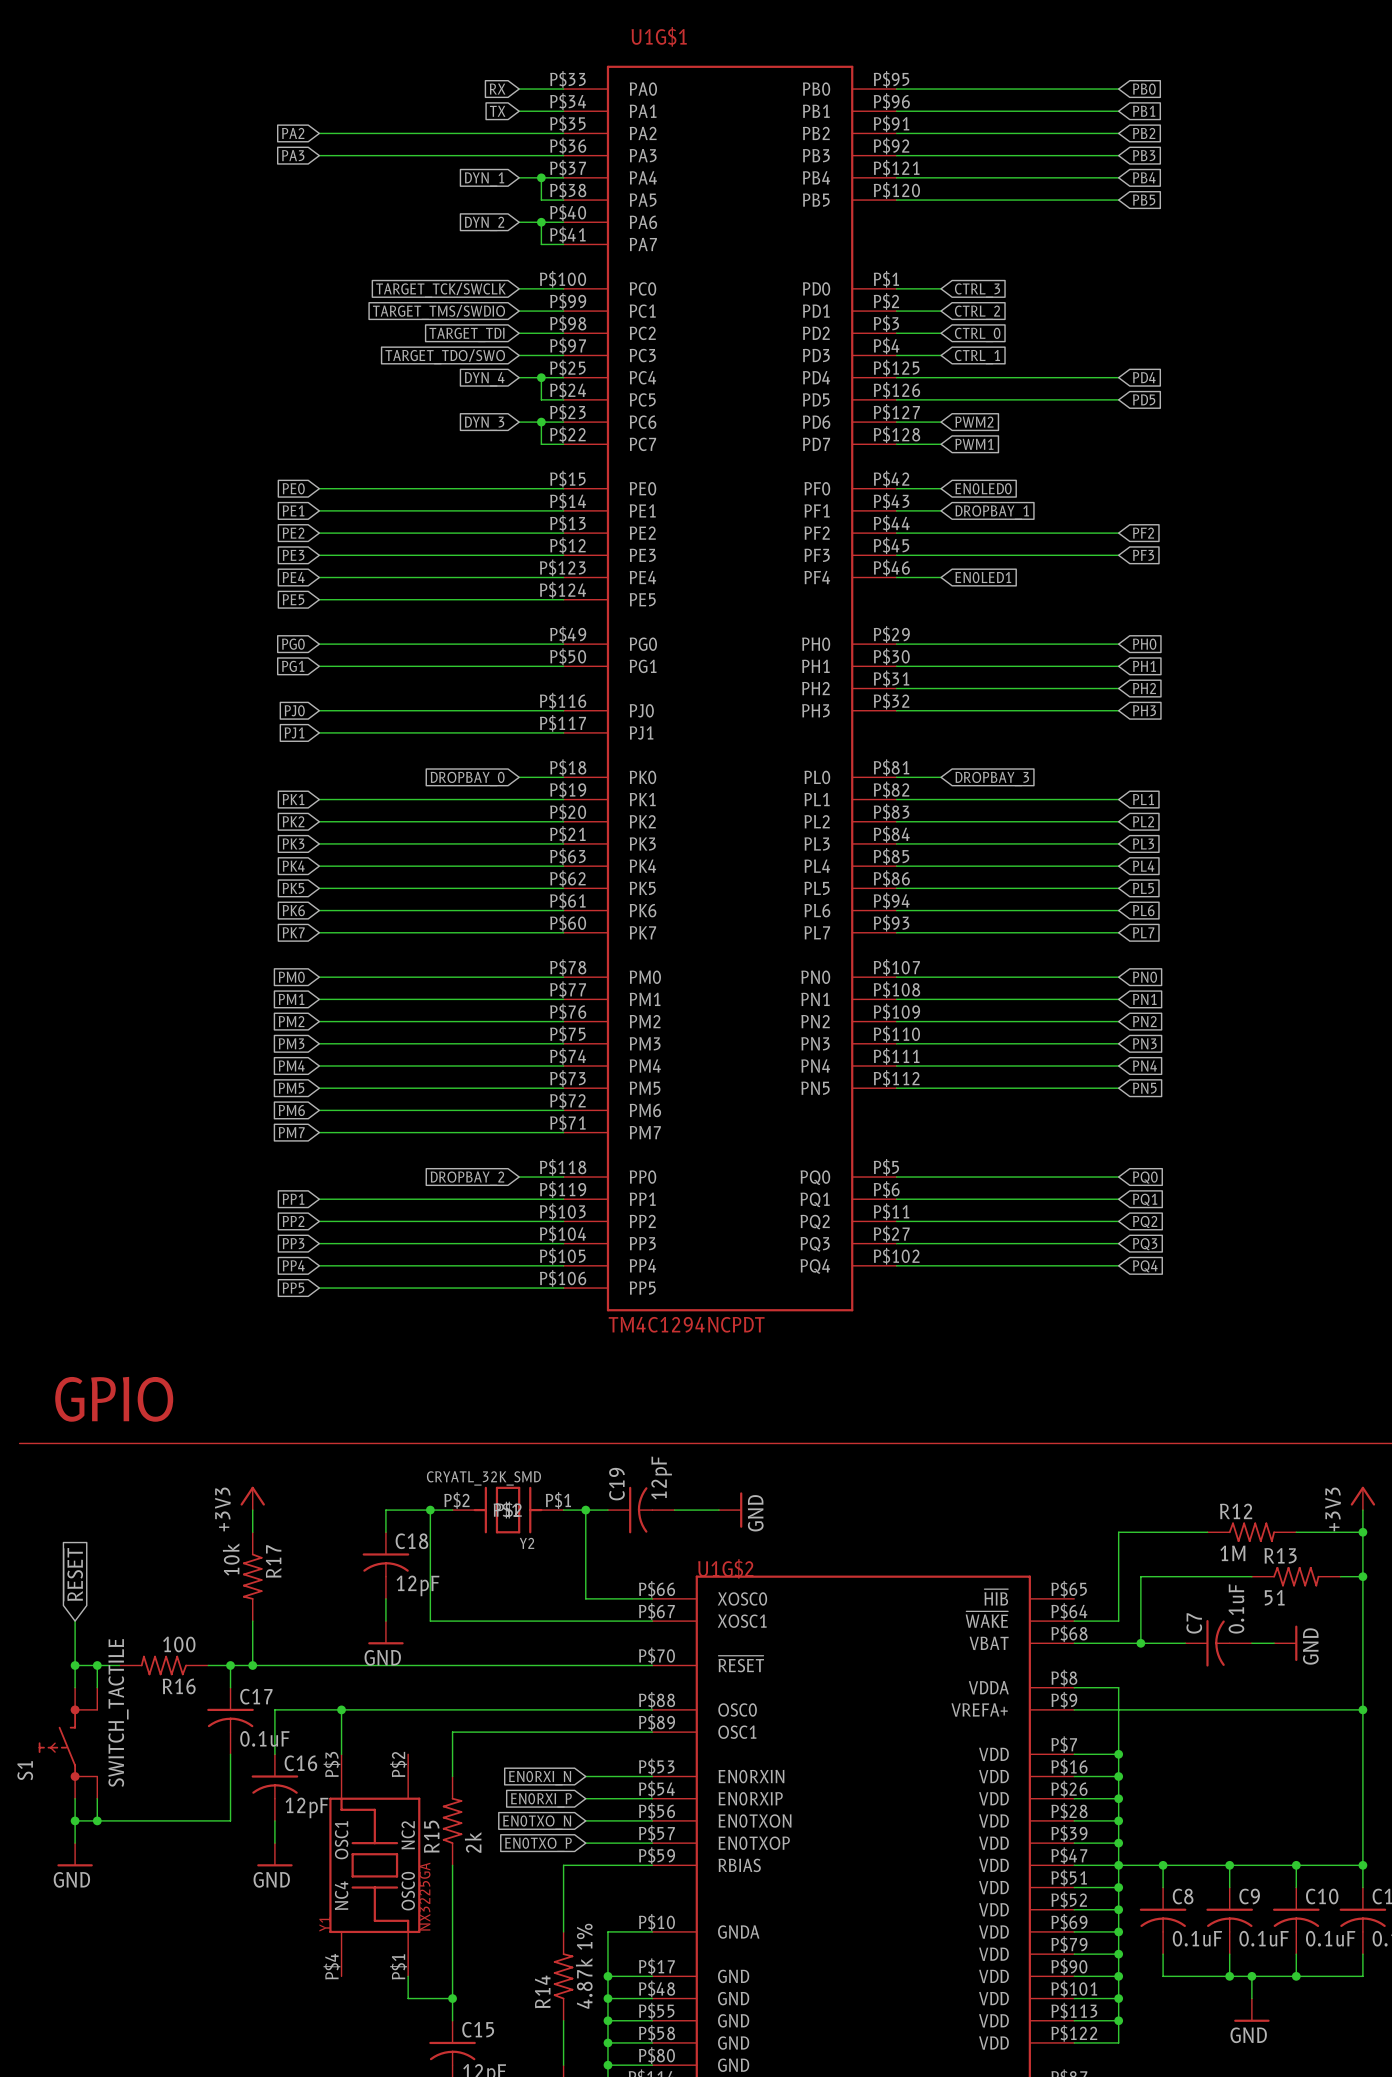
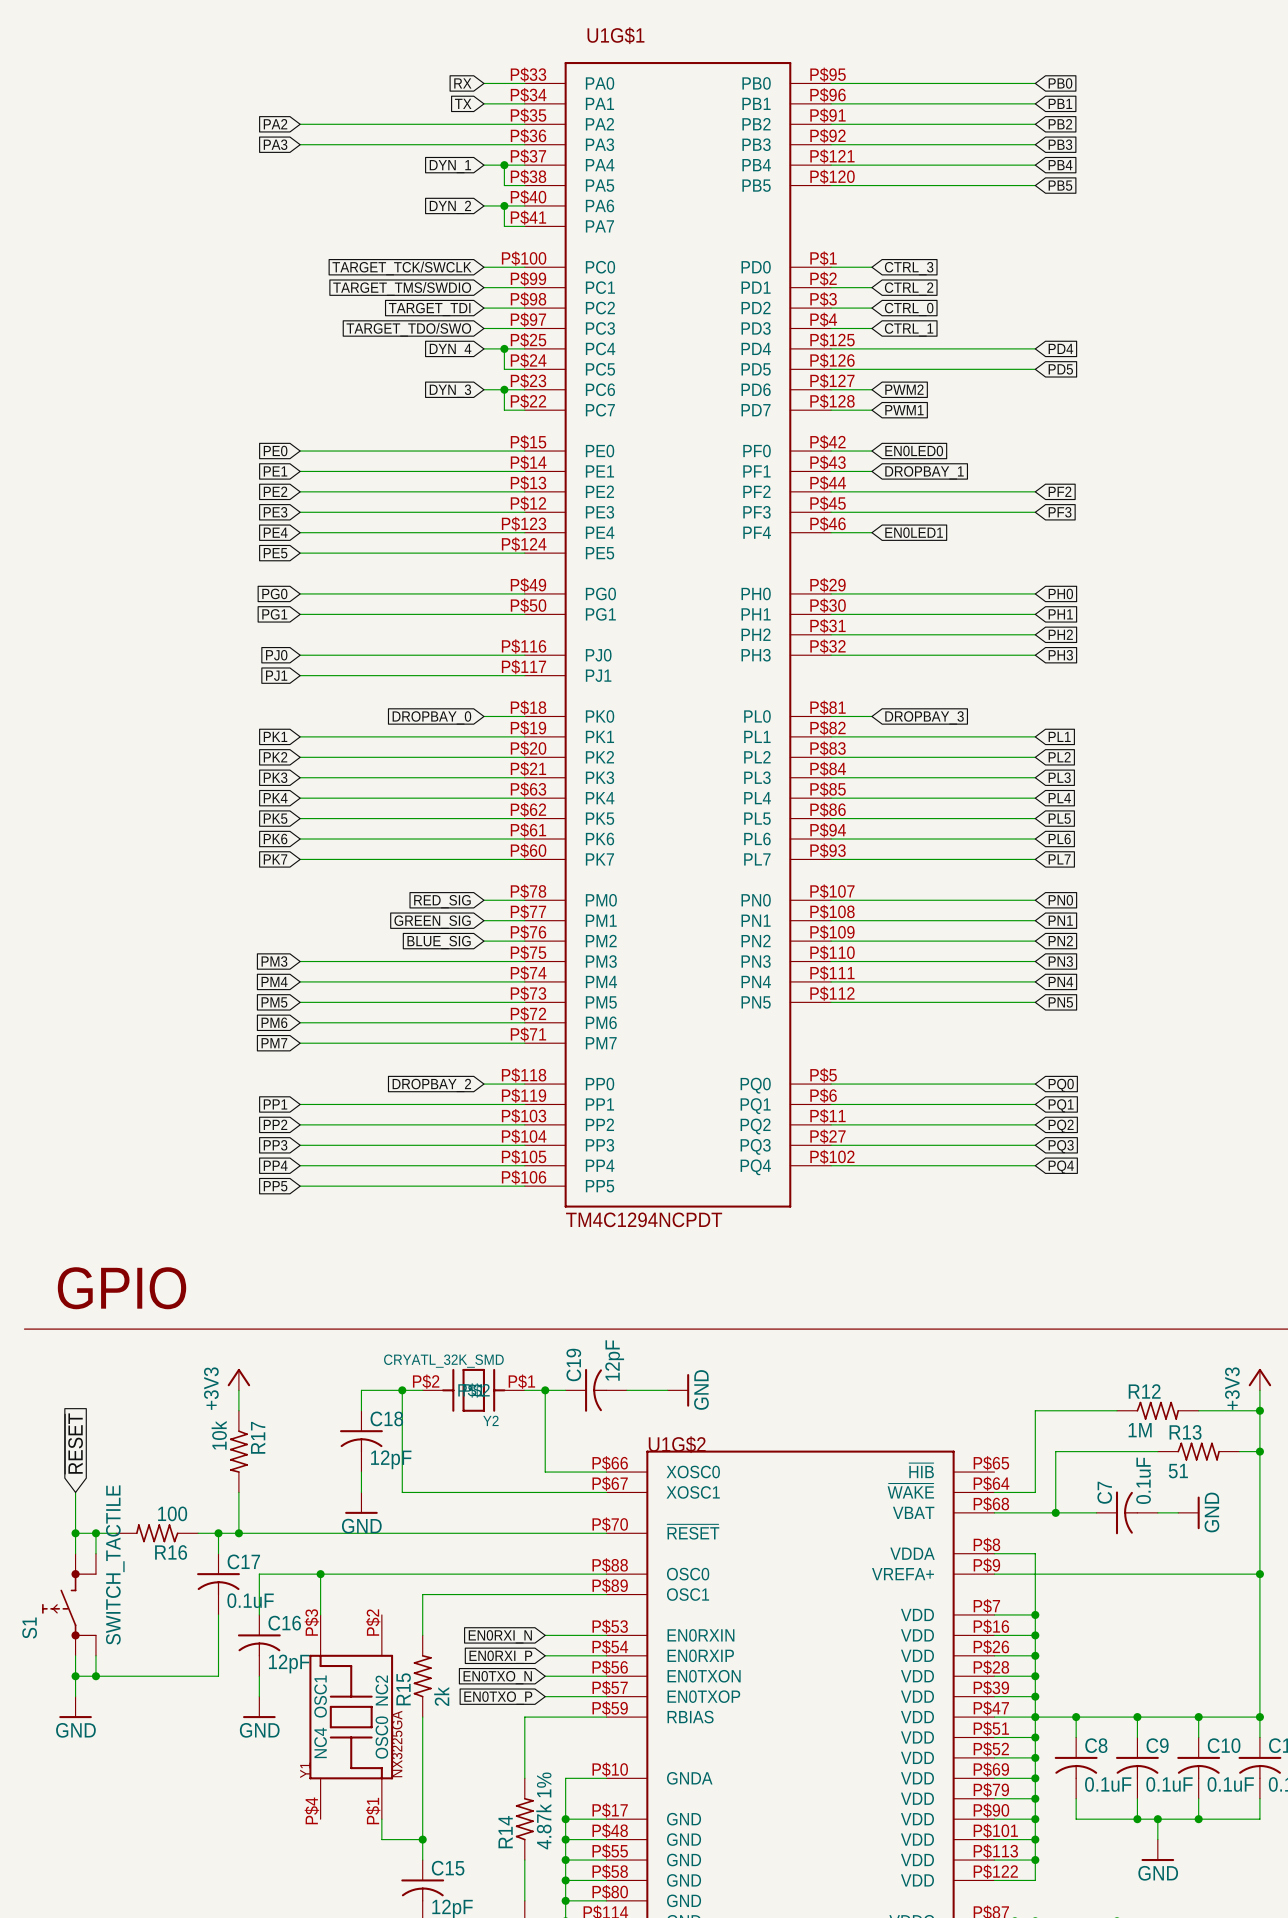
global label: PM0 (291, 977) -> none
wire: (319, 977) (519, 977) -> none
global label: none -> RED_SIG (442, 901)
global label: PM1 (291, 999) -> none
wire: (319, 999) (519, 999) -> none
global label: none -> GREEN_SIG (432, 922)
global label: PM2 (291, 1021) -> none
wire: (319, 1021) (519, 1021) -> none
global label: none -> BLUE_SIG (439, 942)

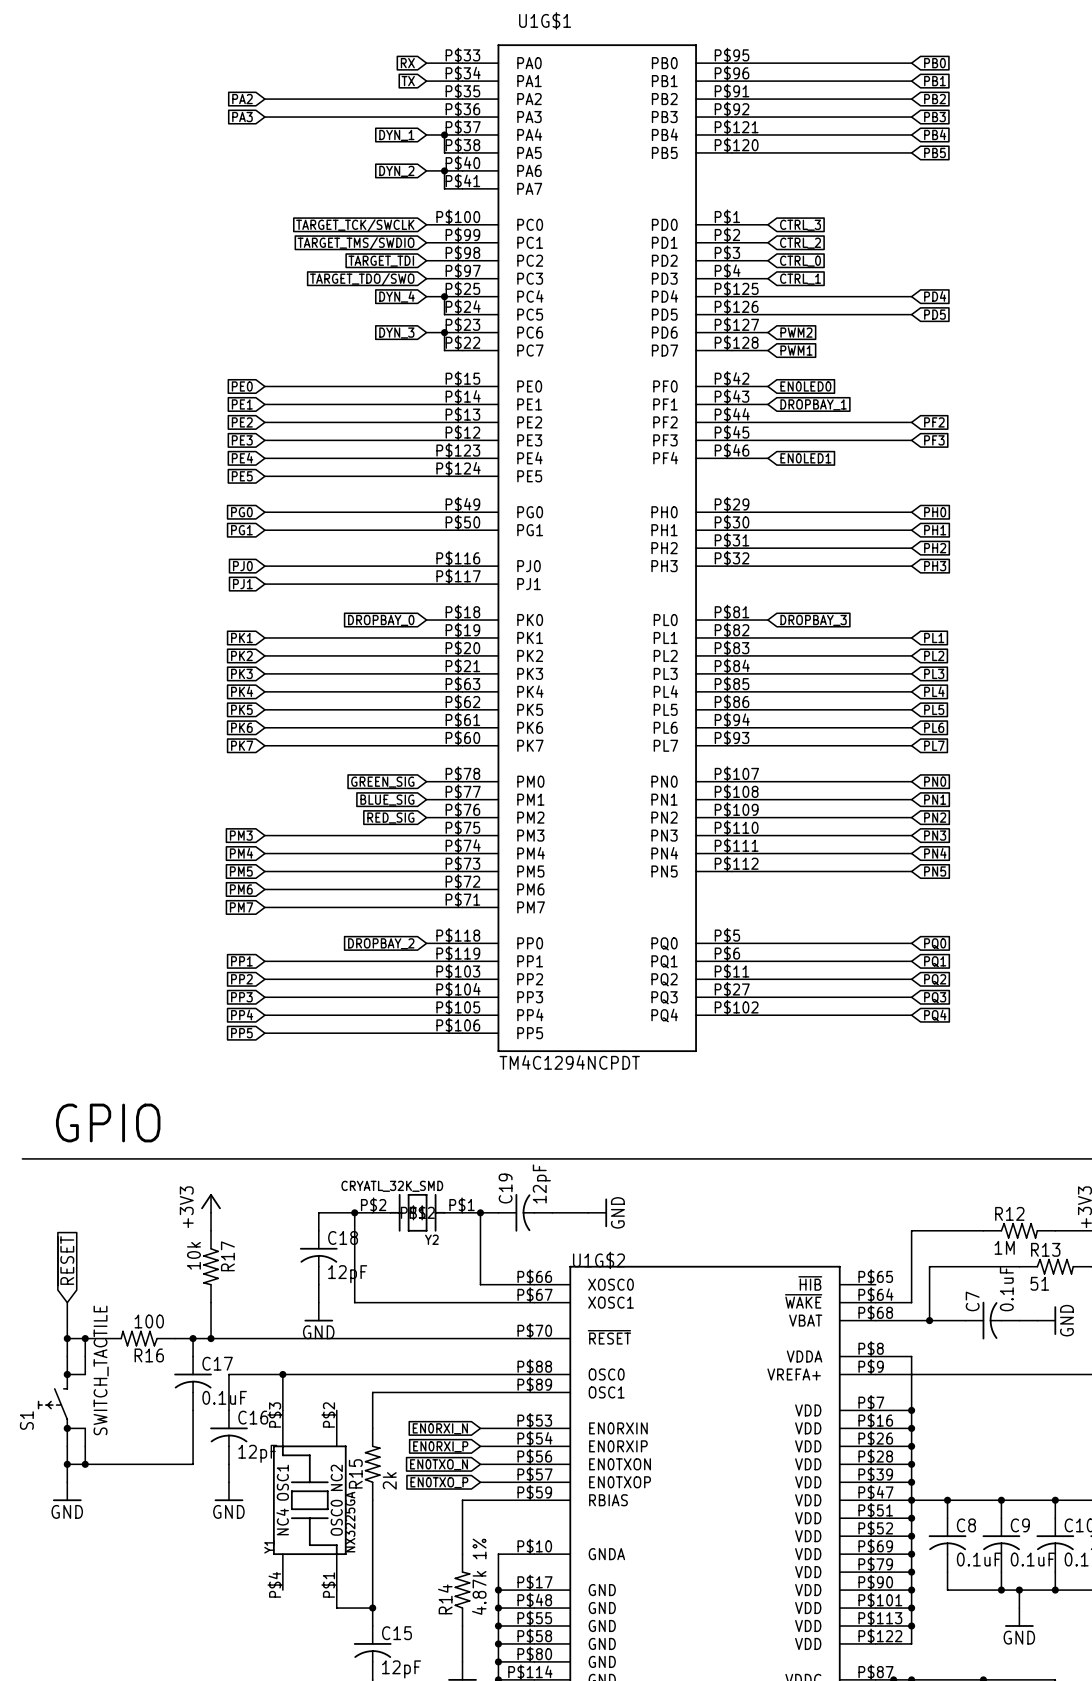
global label: RED_SIG (442, 901) -> GREEN_SIG (382, 782)
global label: GREEN_SIG (432, 922) -> BLUE_SIG (387, 800)
global label: BLUE_SIG (439, 942) -> RED_SIG (390, 818)

